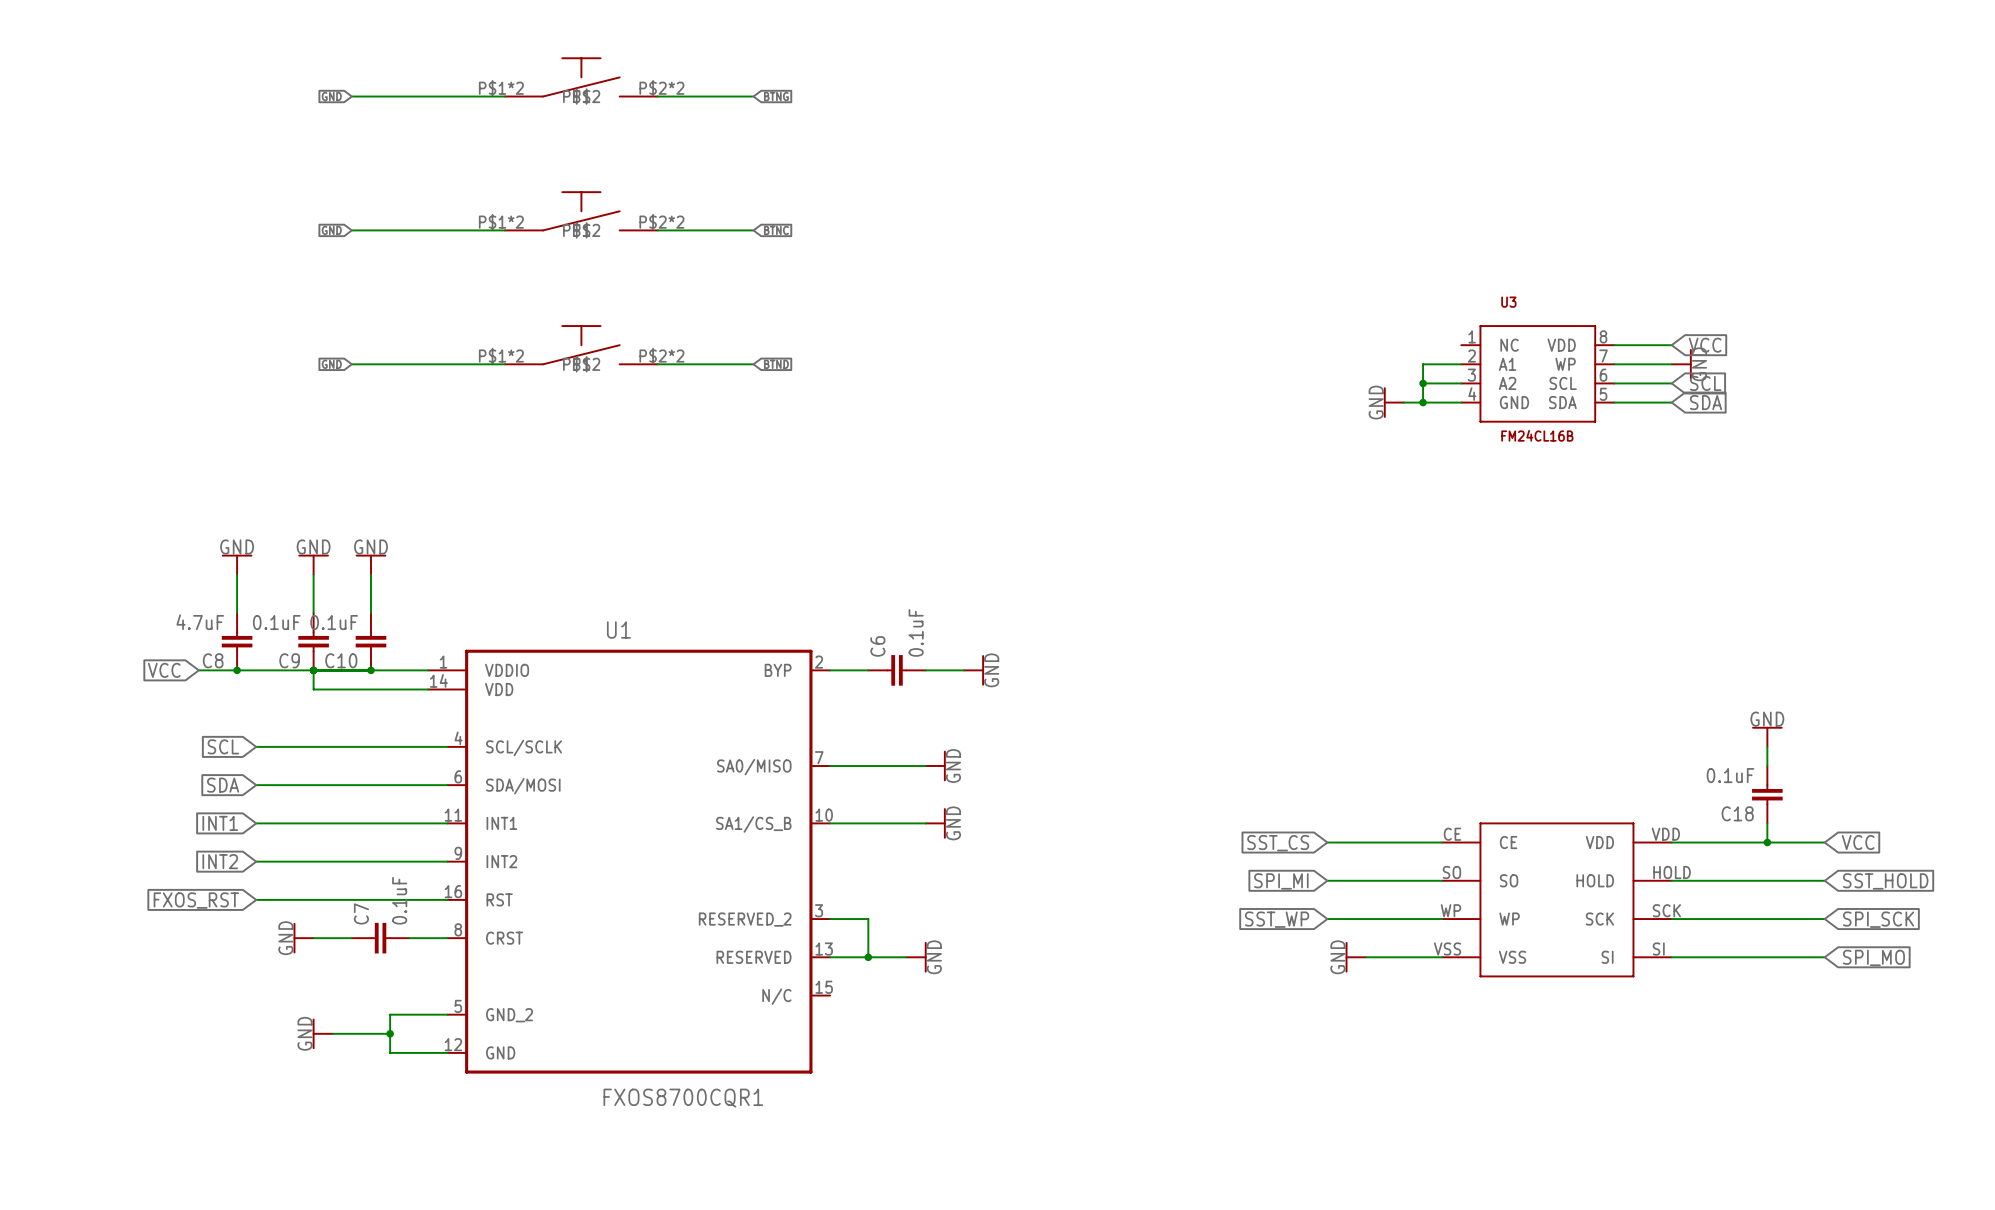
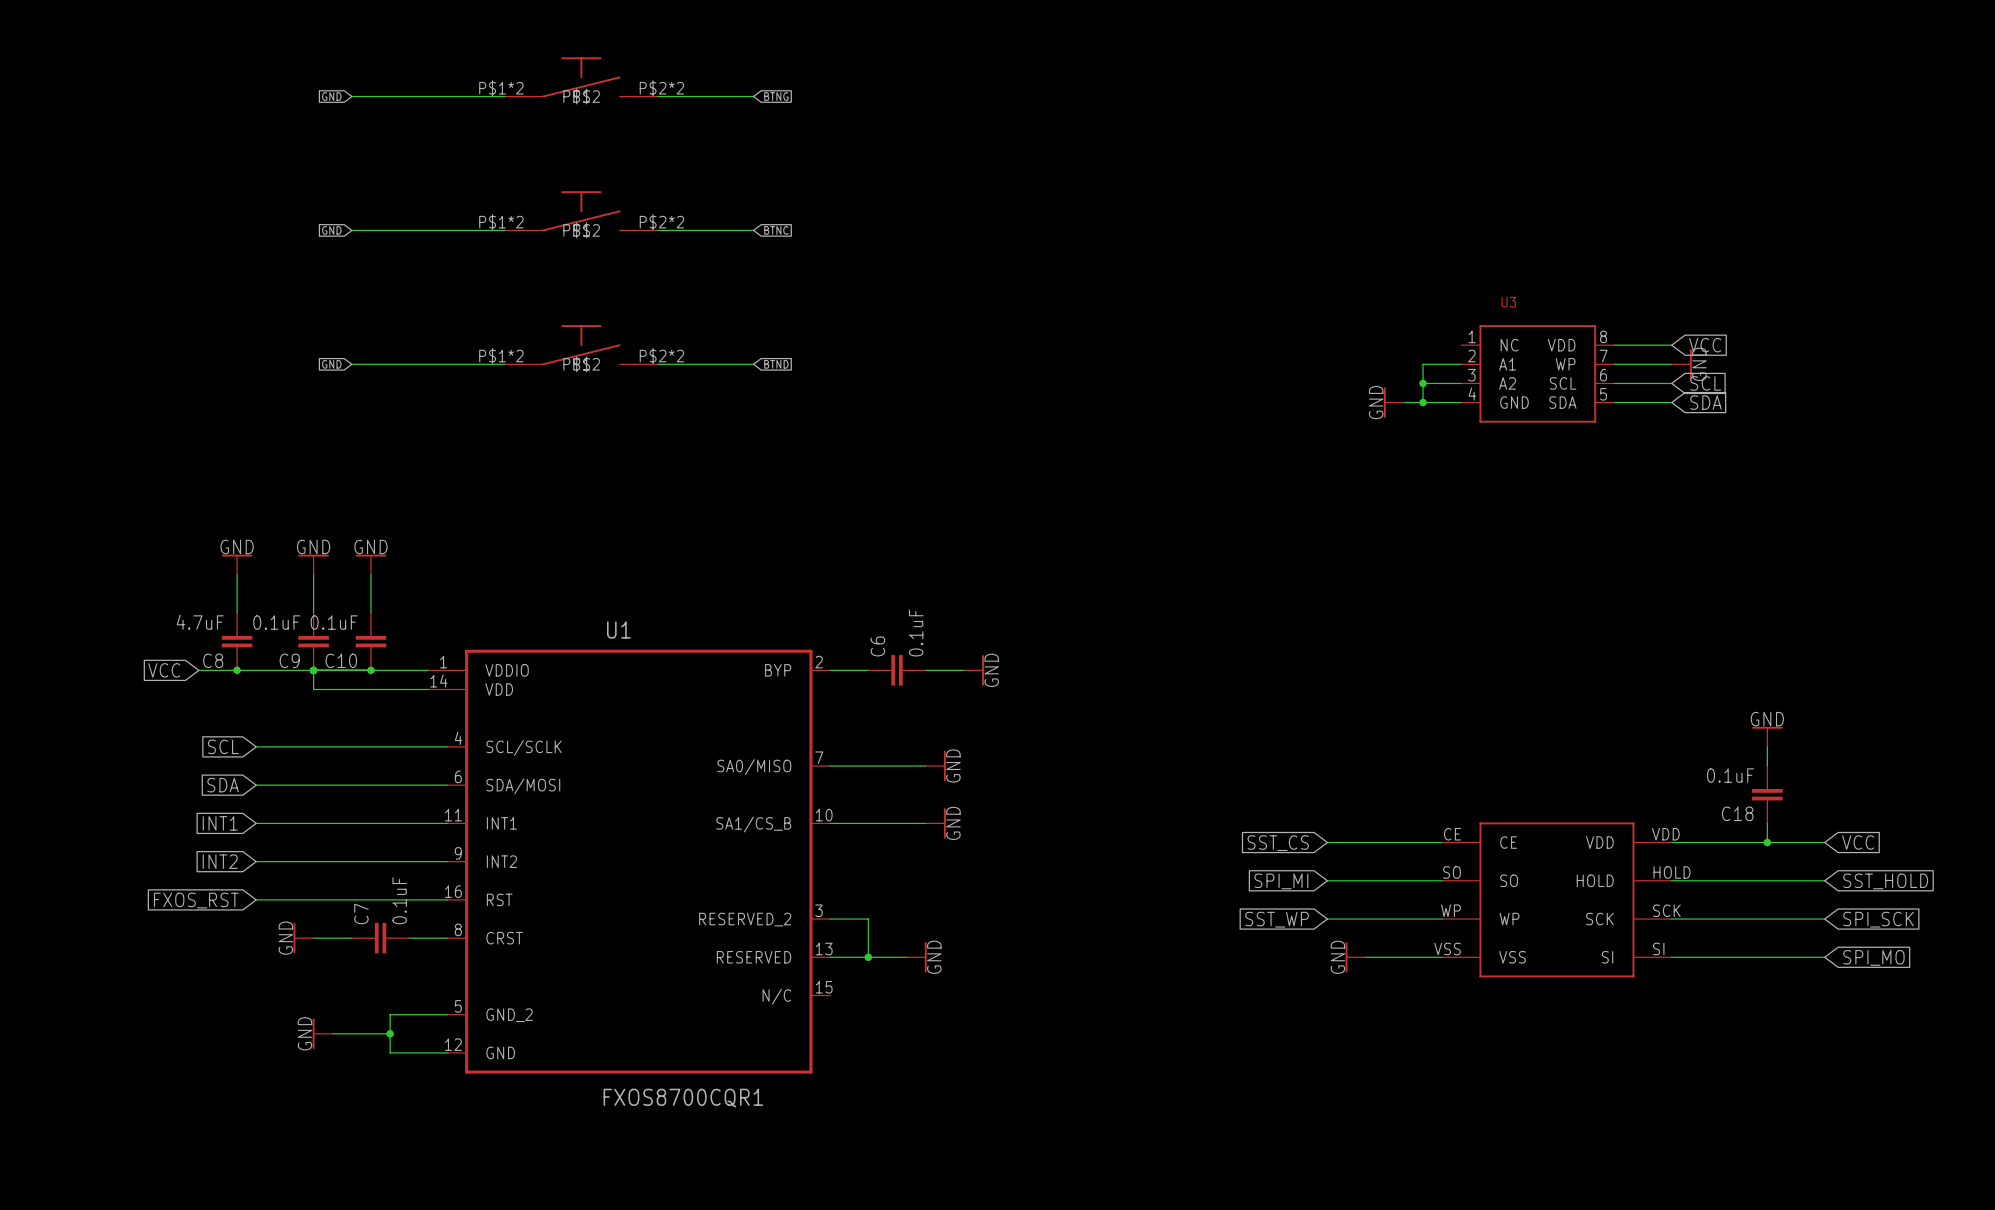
U3 value: FM24CL16B (1537, 435) -> none

